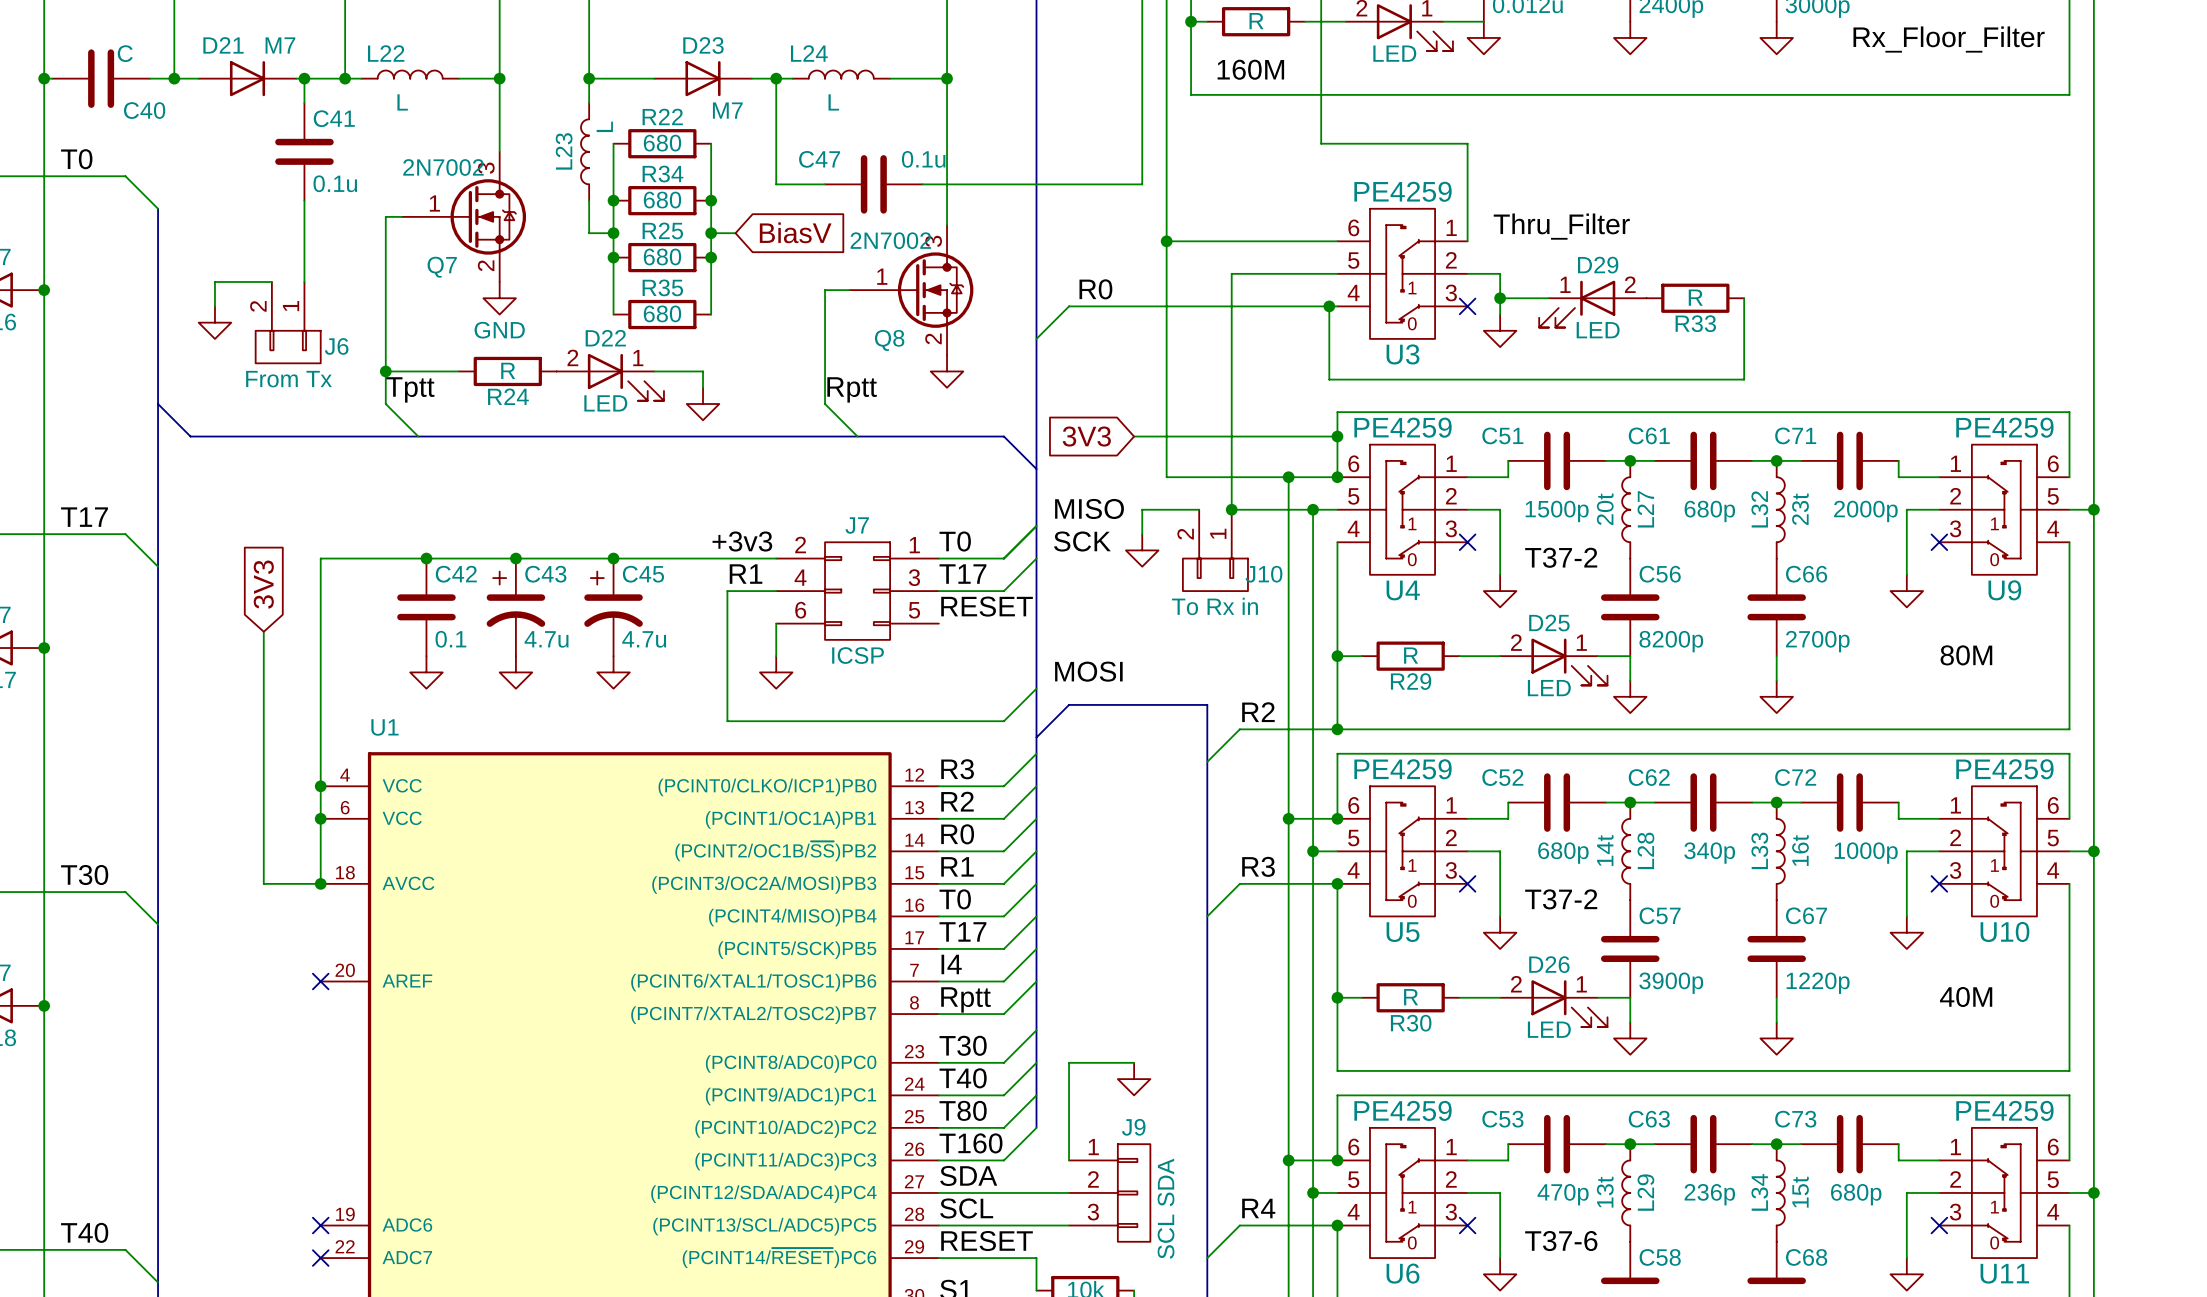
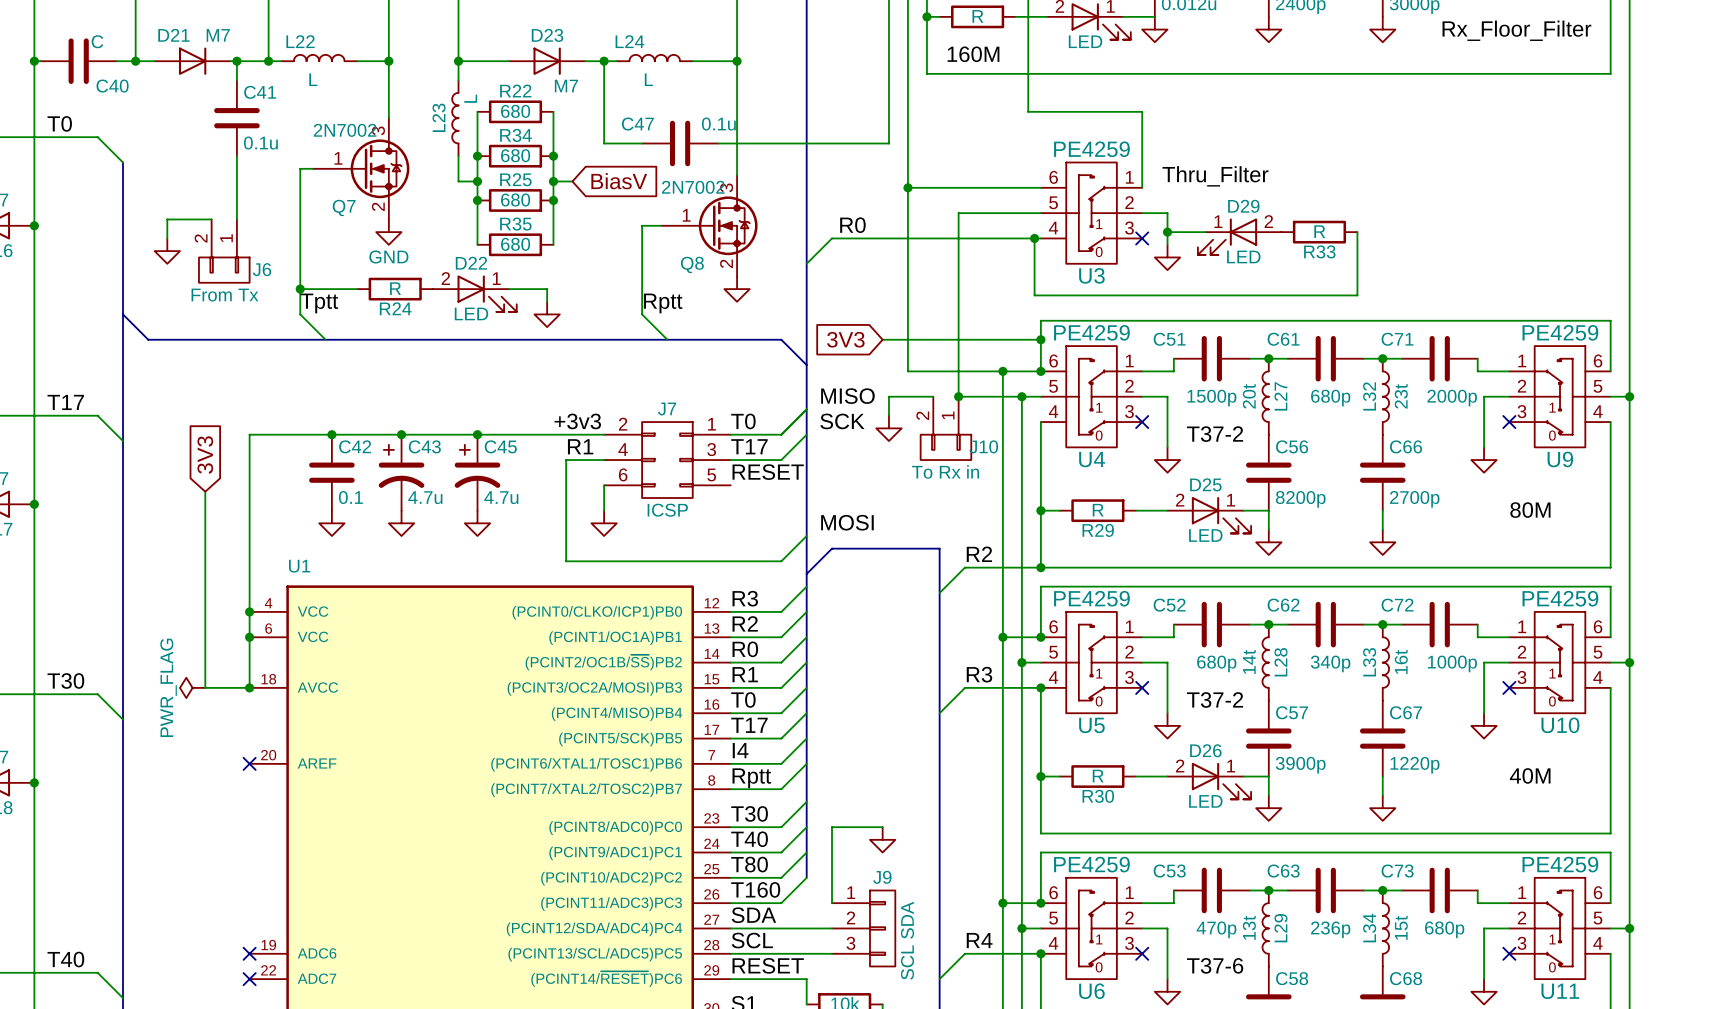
power symbol: none -> PWR_FLAG (192, 687)

